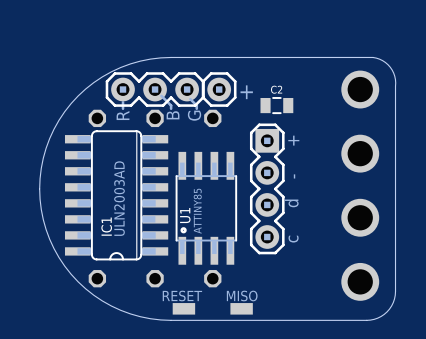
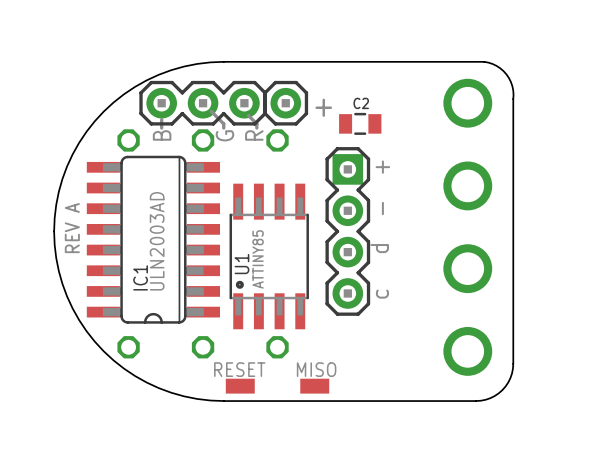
text: R (123, 115) -> B (162, 135)
text: B (173, 115) -> G (224, 135)
text: G (194, 115) -> R (254, 135)
text: none -> REV A (72, 228)

